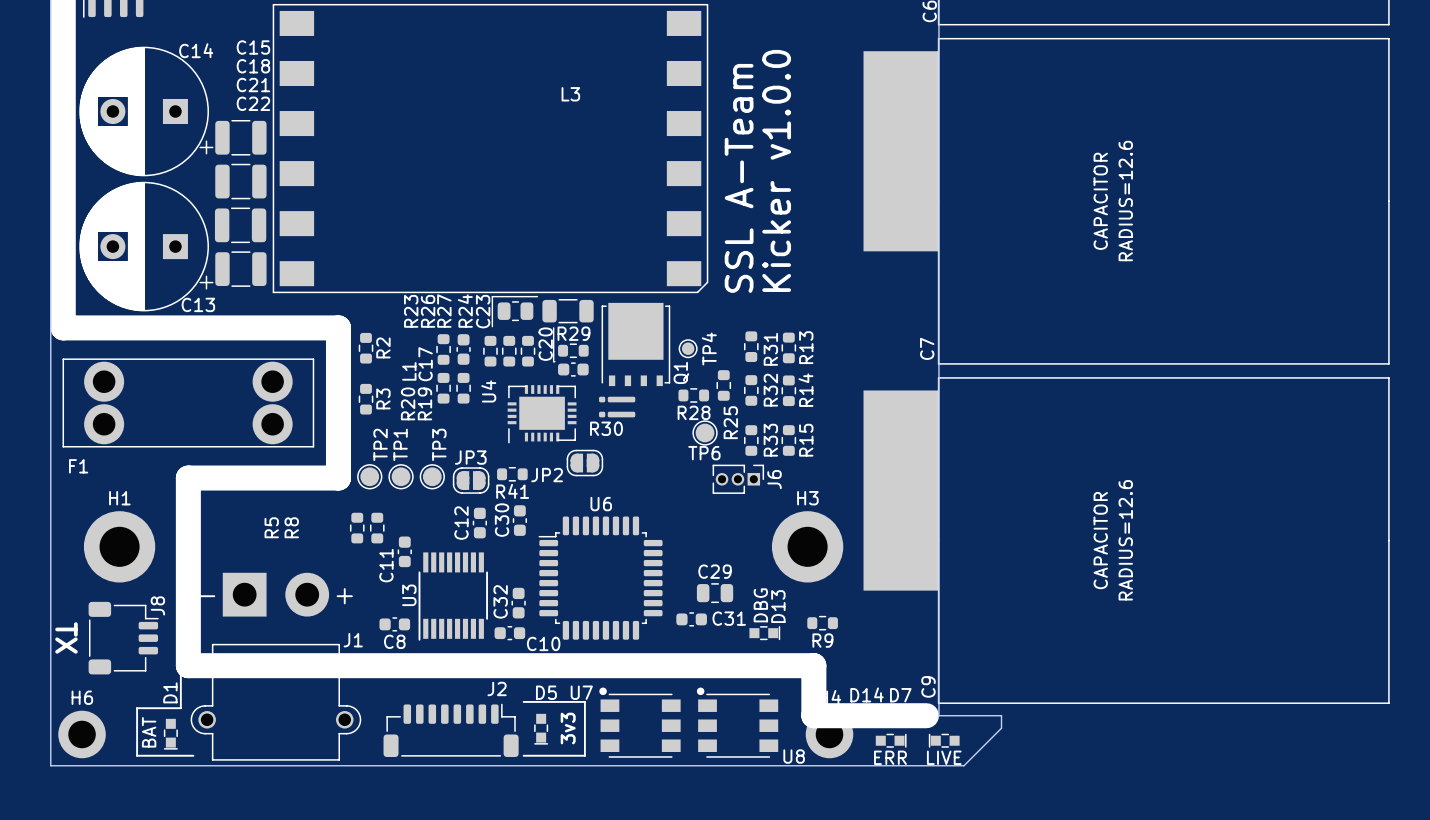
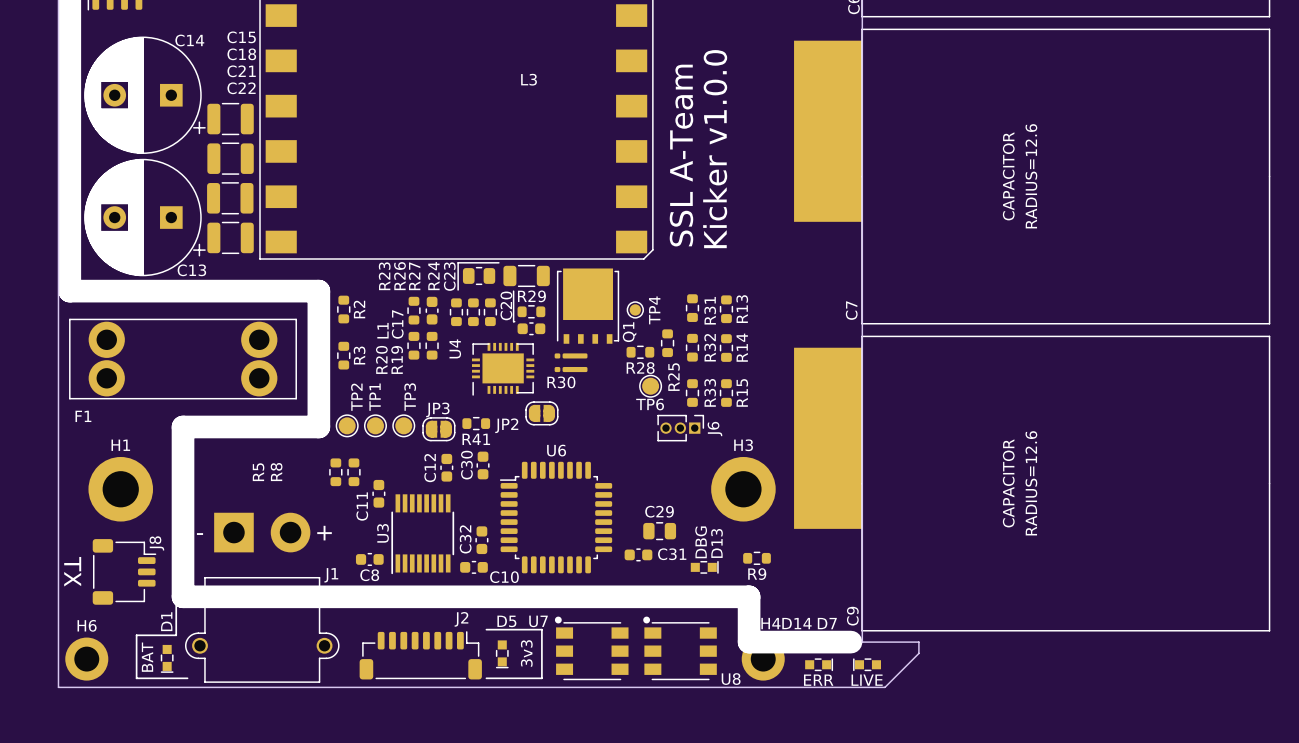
H4 footprint: [805, 710, 854, 759] -> [741, 637, 785, 681]

